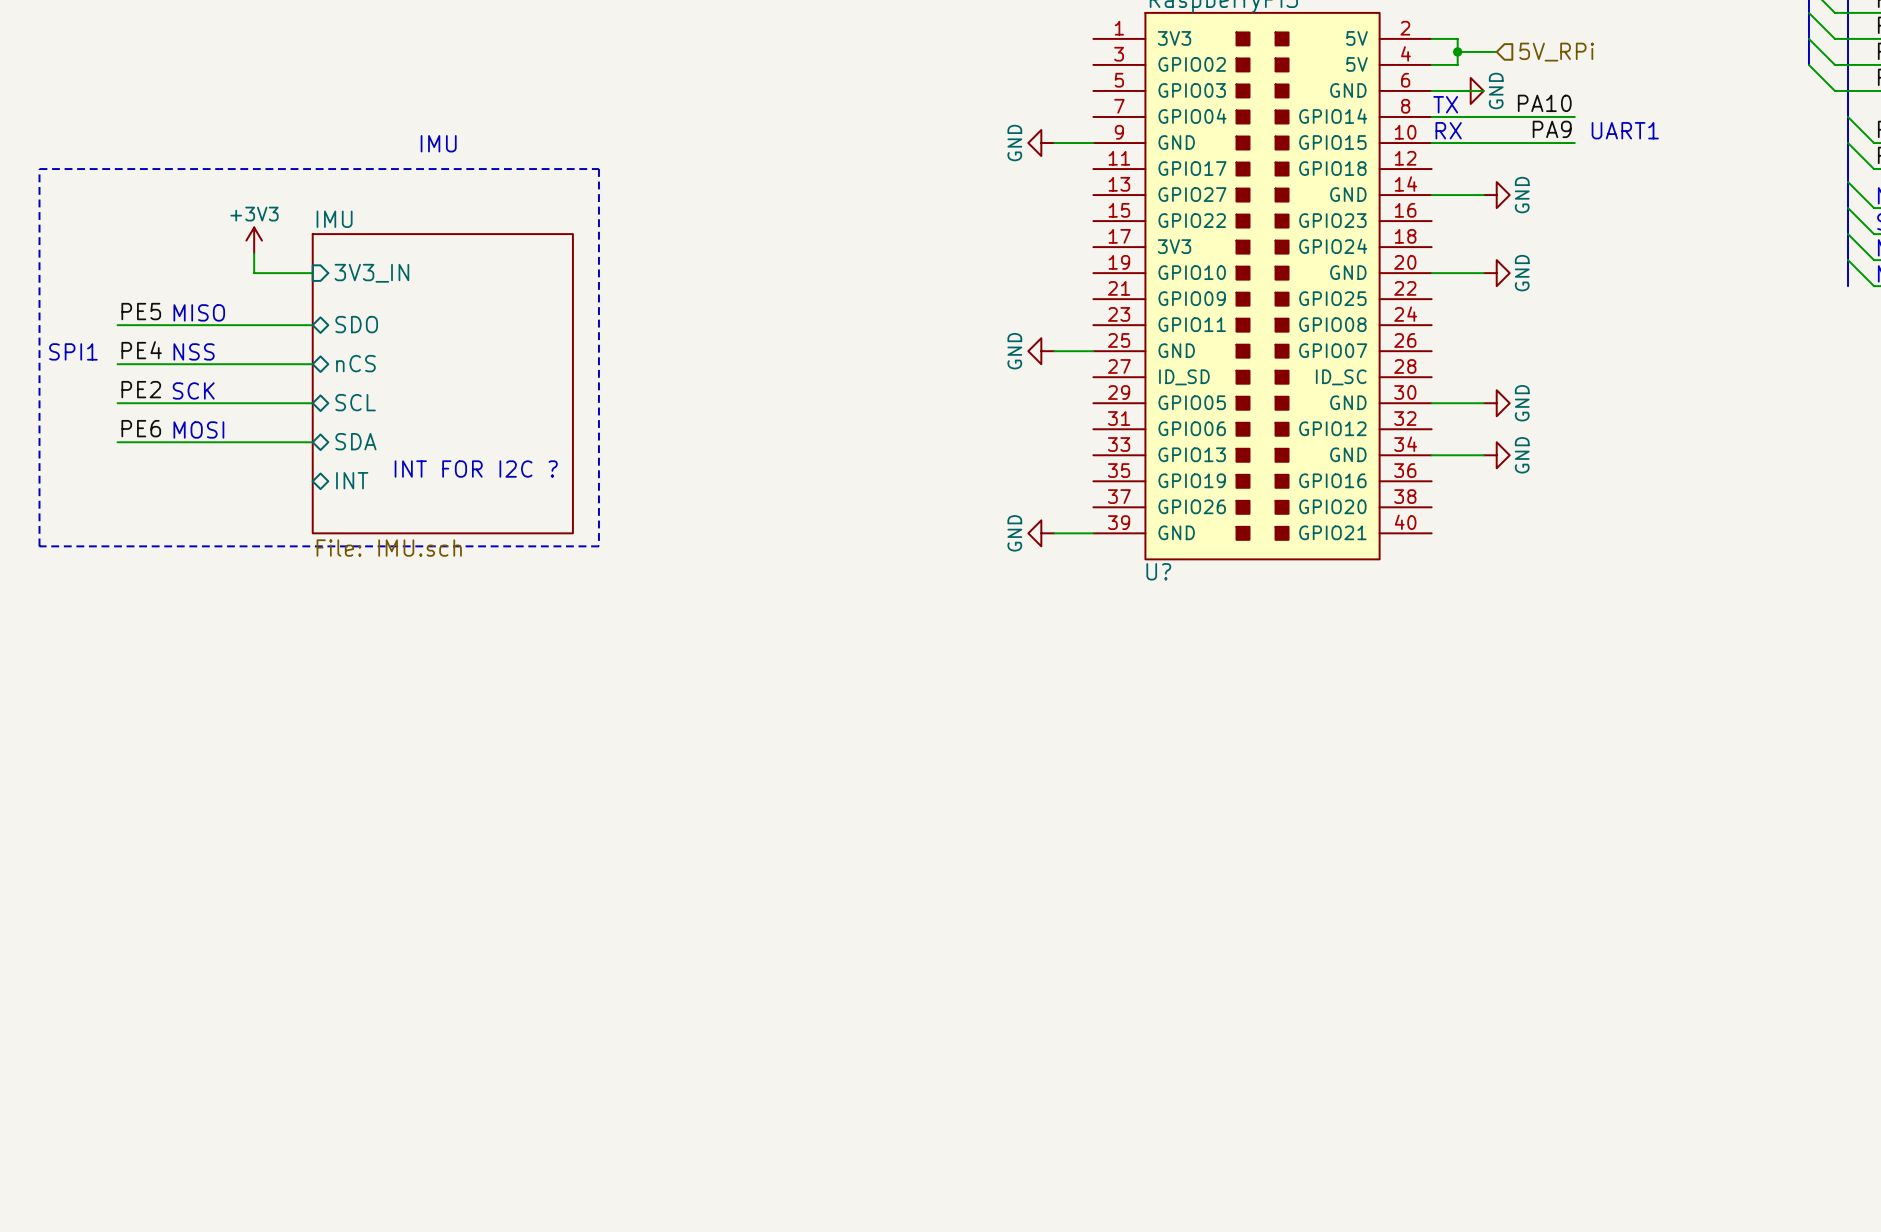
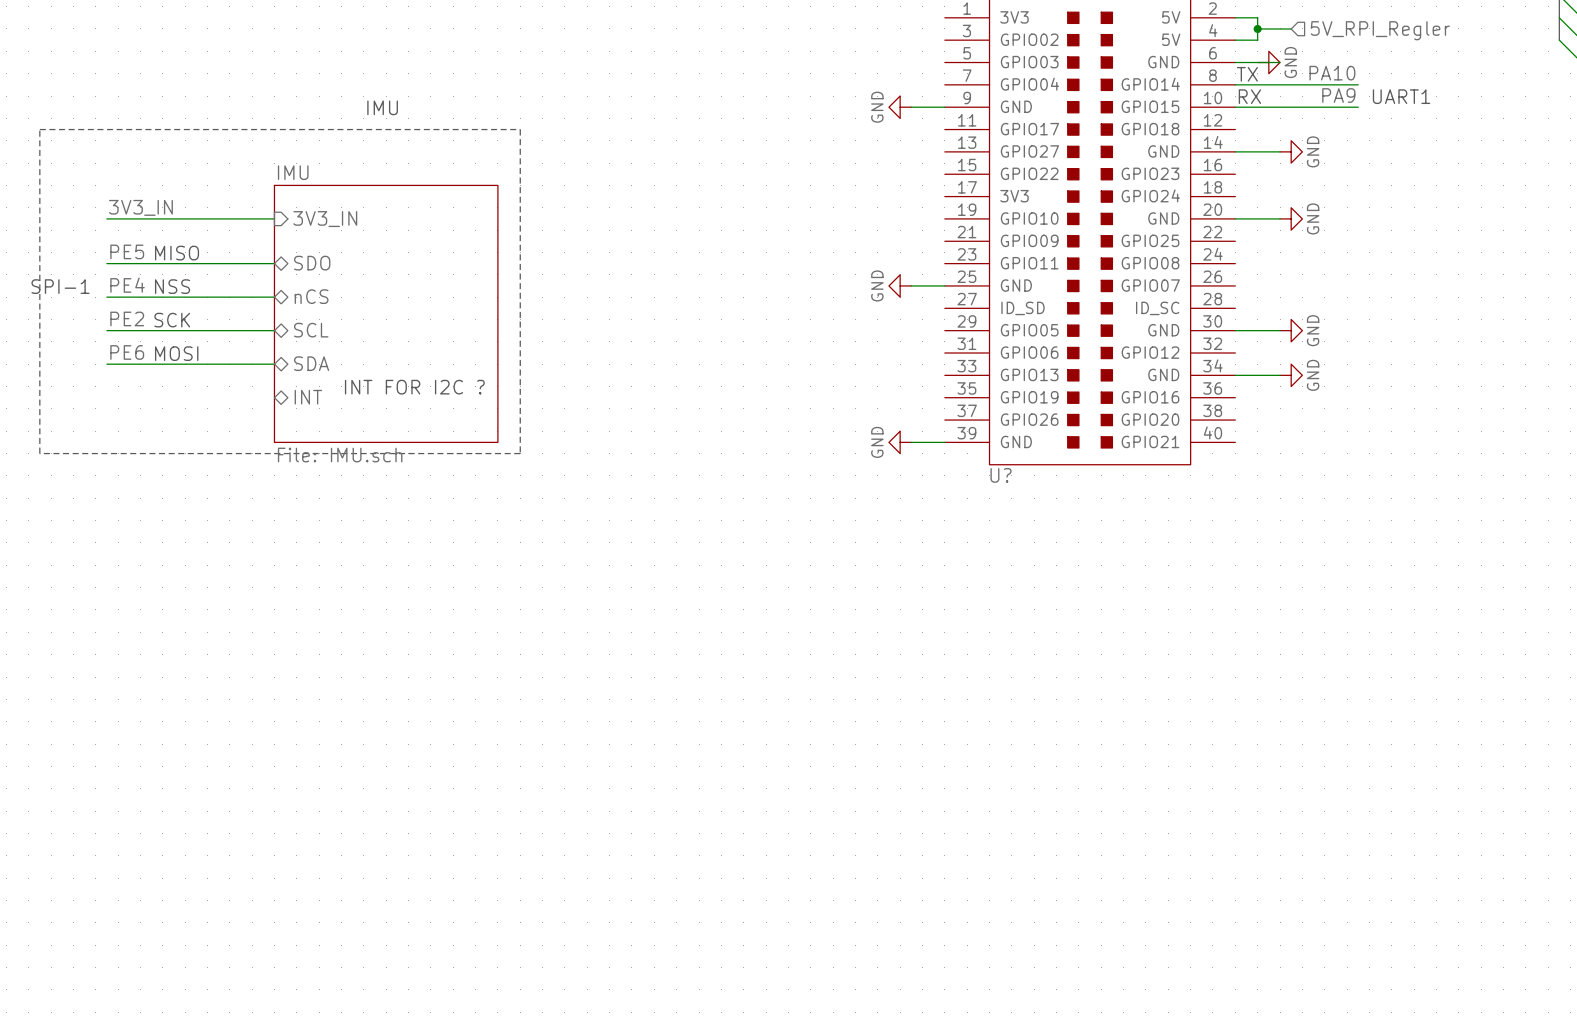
hierarchical label: 5V_RPi (1556, 52) -> 5V_RPI_Regler (1380, 30)
power symbol: +3V3 (254, 240) -> none
wire: (254, 253) (254, 273) -> (106, 218) (224, 218)
label: none -> 3V3_IN (140, 207)
text: SPI1 (73, 351) -> SPI-1 (60, 286)

